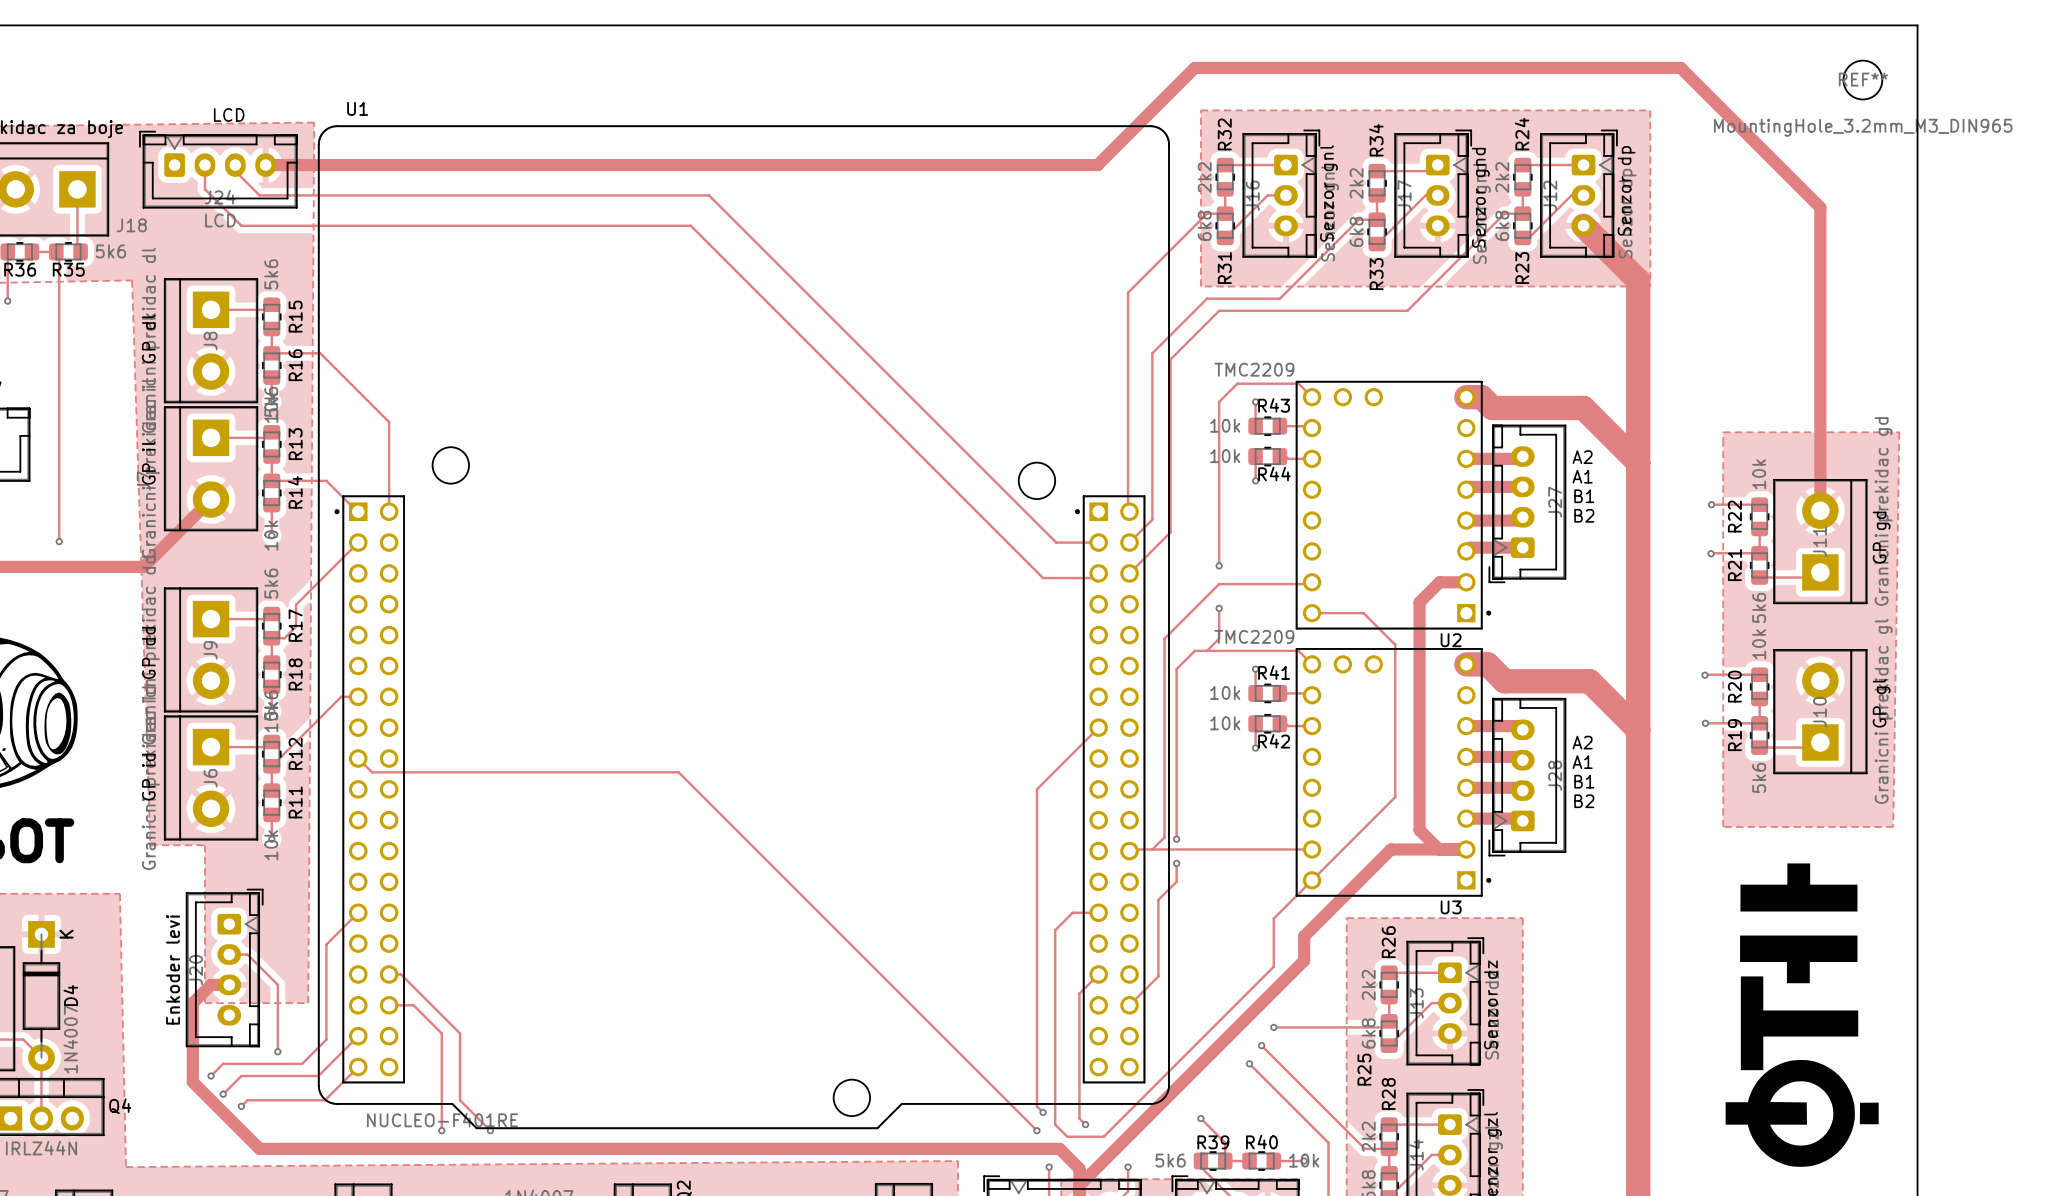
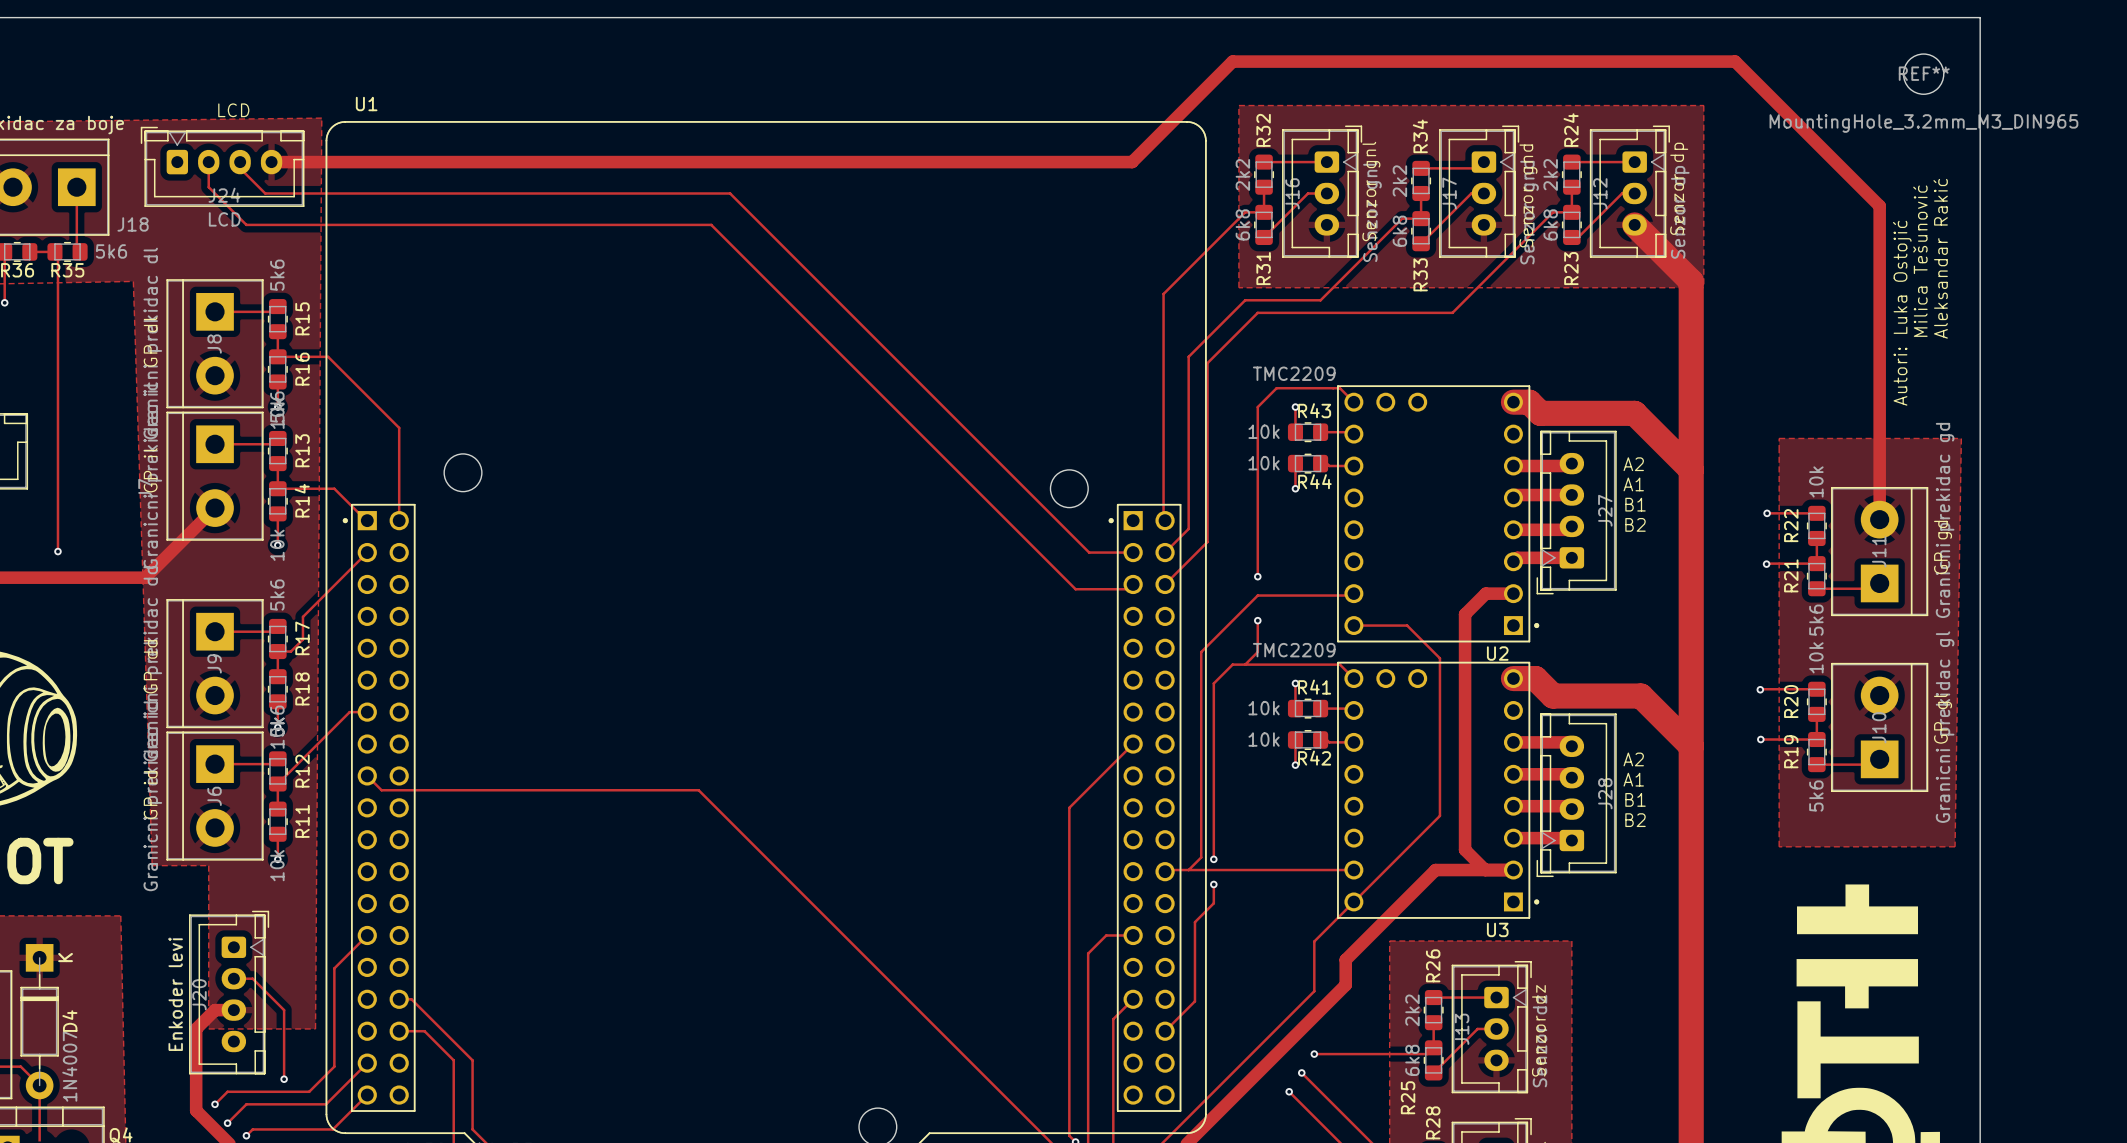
text: none -> Aleksandar Rakić (1940, 258)
text: none -> Milica Tešunović (1920, 261)
text: none -> Autori: Luka Ostojić (1902, 313)

